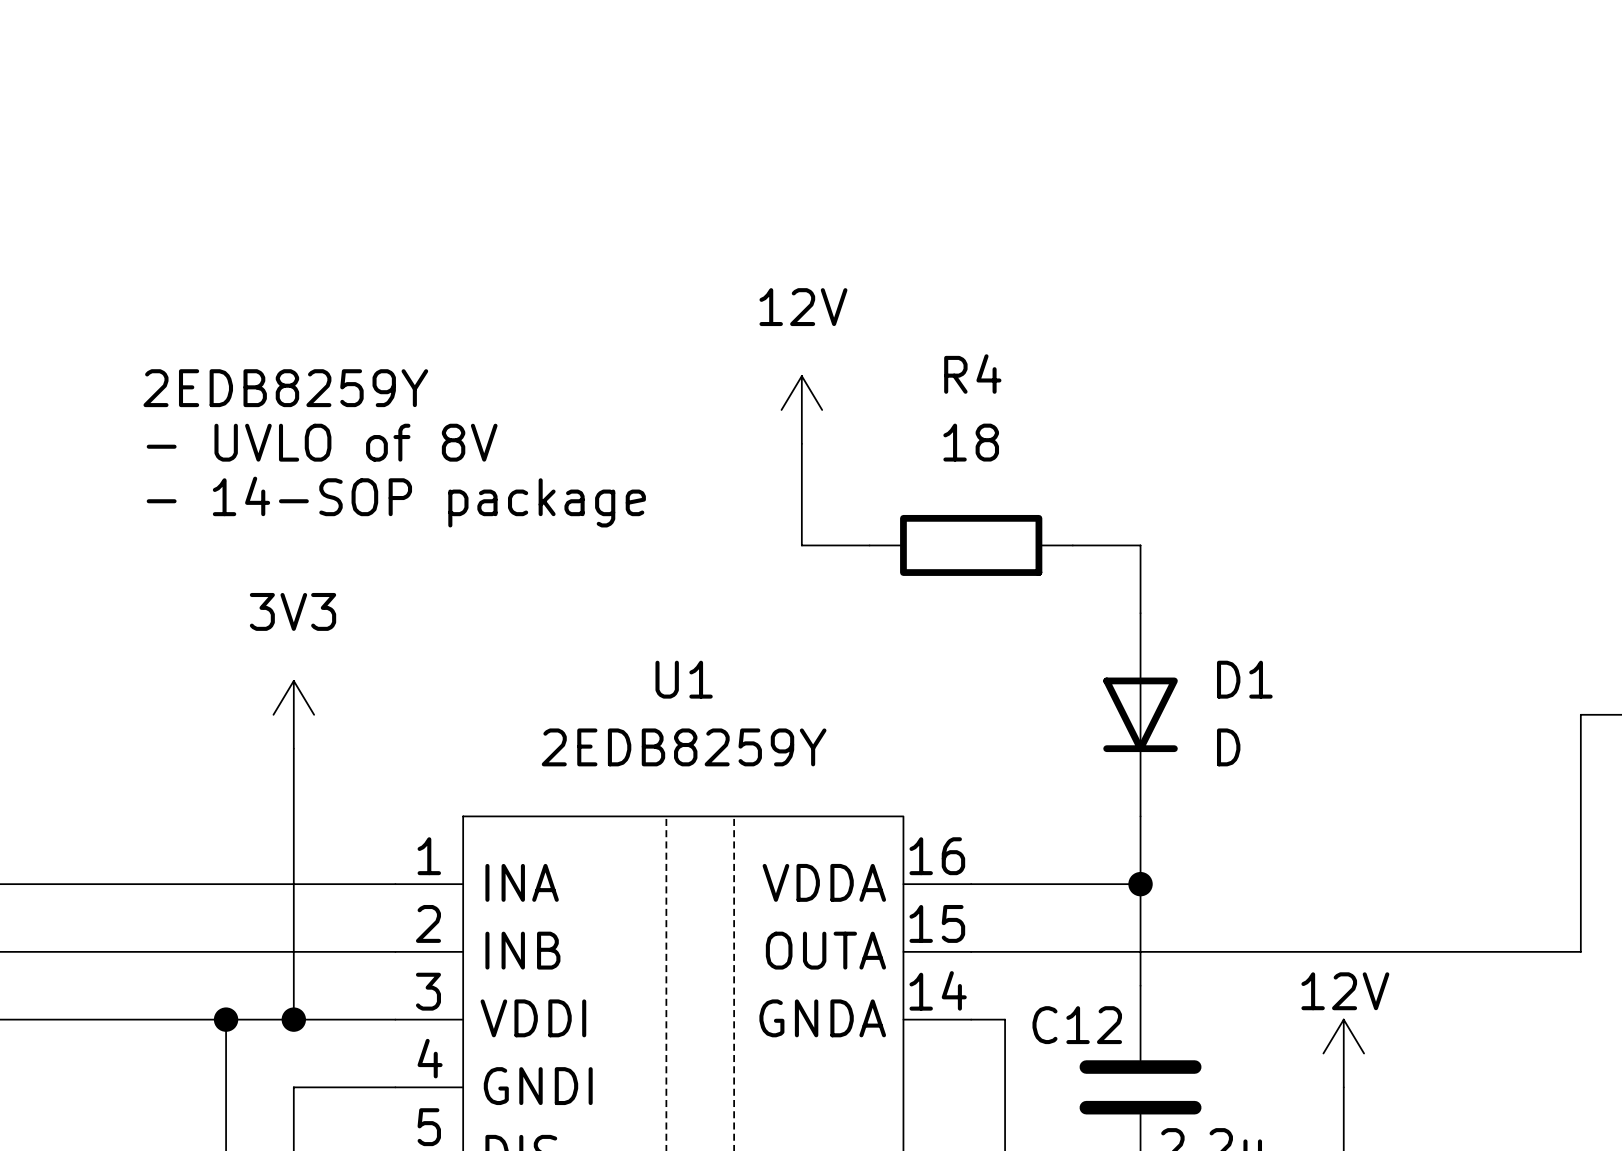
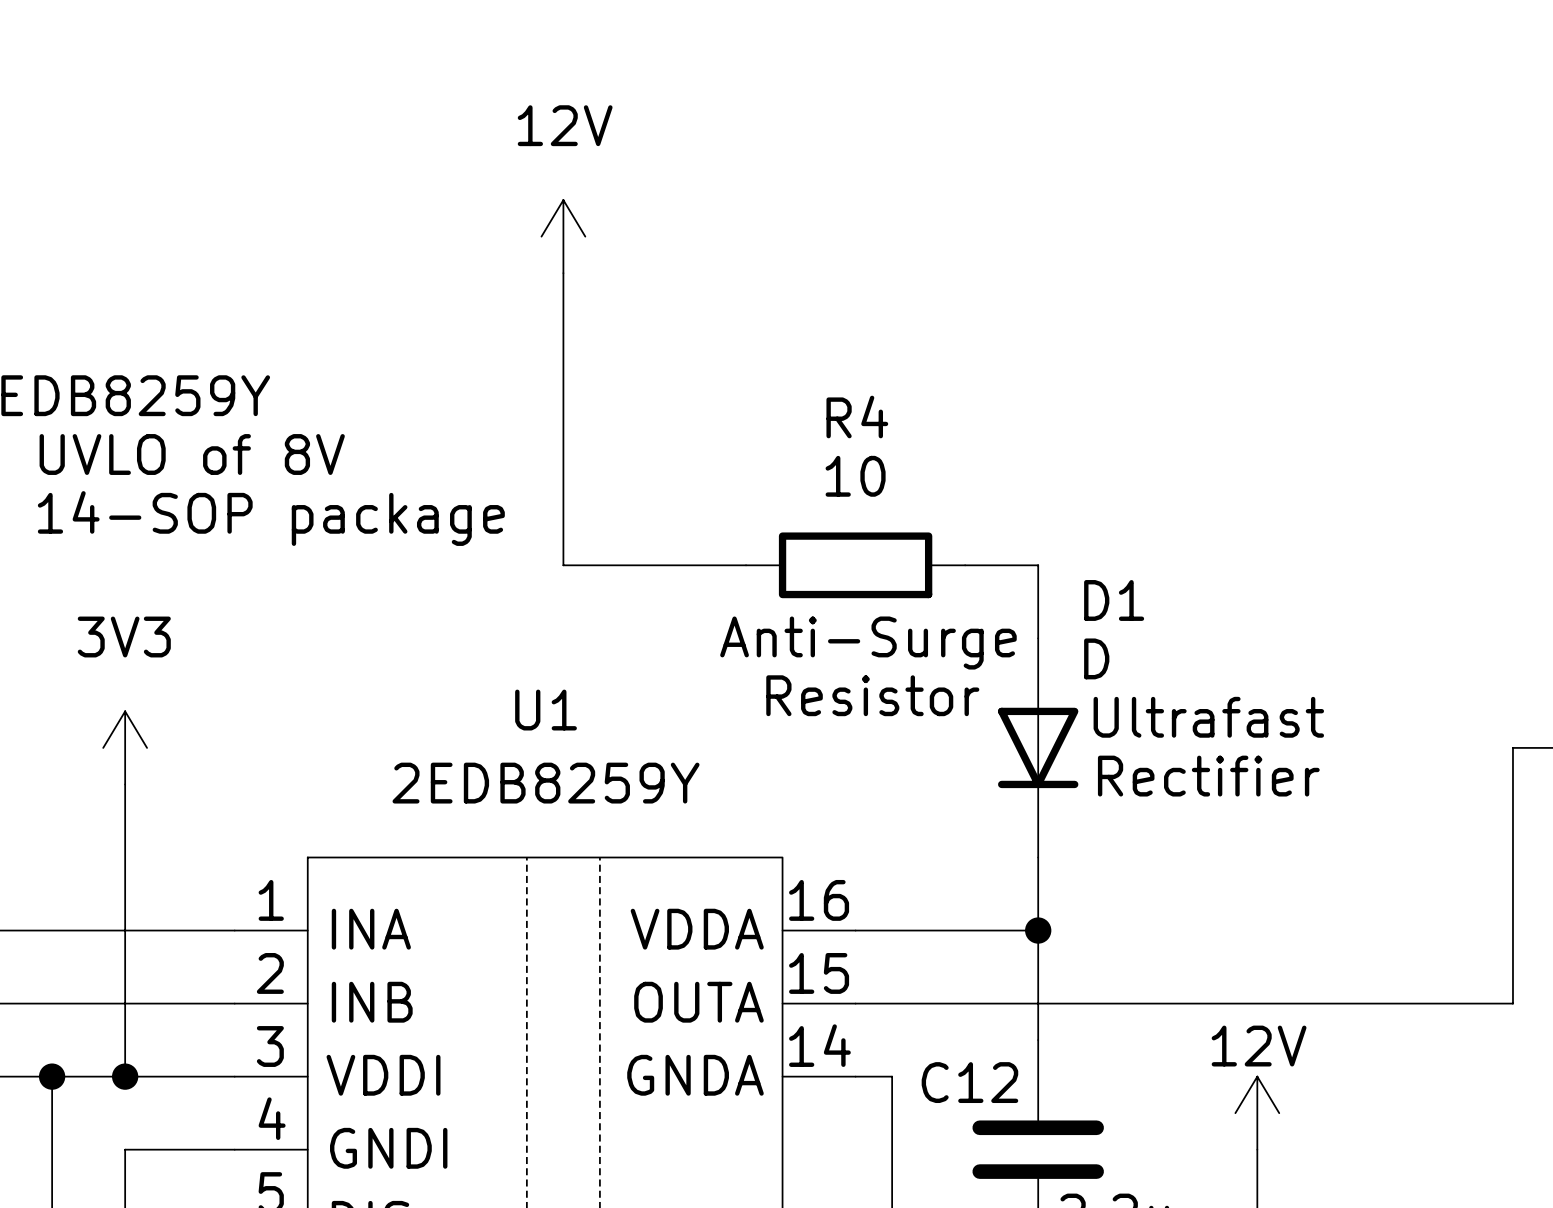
R4 name position: R4 (972, 374) -> R4 (857, 417)
power symbol position: 12V (801, 409) -> 12V (563, 236)
R4 value: 18 (971, 442) -> 10 (855, 476)
wire: (801, 443) (801, 545) -> (563, 273) (563, 565) (672, 565)
text: none -> Anti-Surge (868, 643)
text: none -> Resistor (872, 695)
D1 name position: D1 (1244, 679) -> D1 (1114, 600)
text: none -> Ultrafast (1208, 717)
text: none -> Rectifier (1208, 776)
D1 value position: D (1228, 747) -> D (1096, 658)

